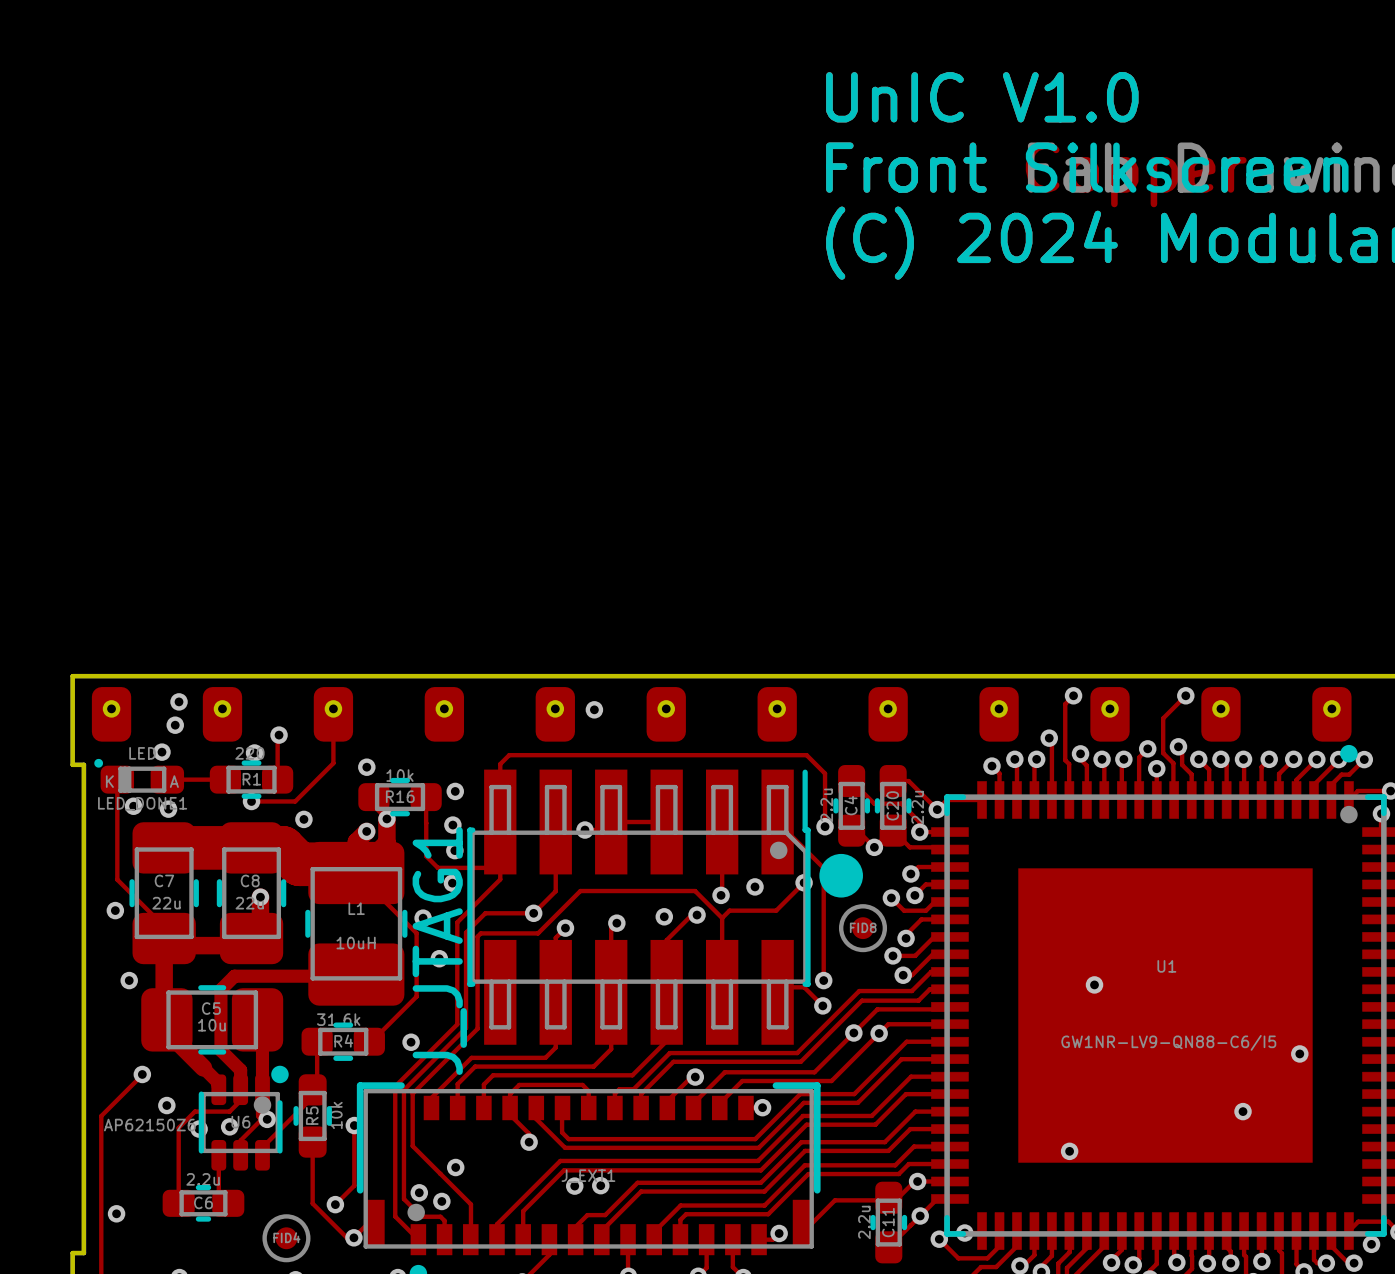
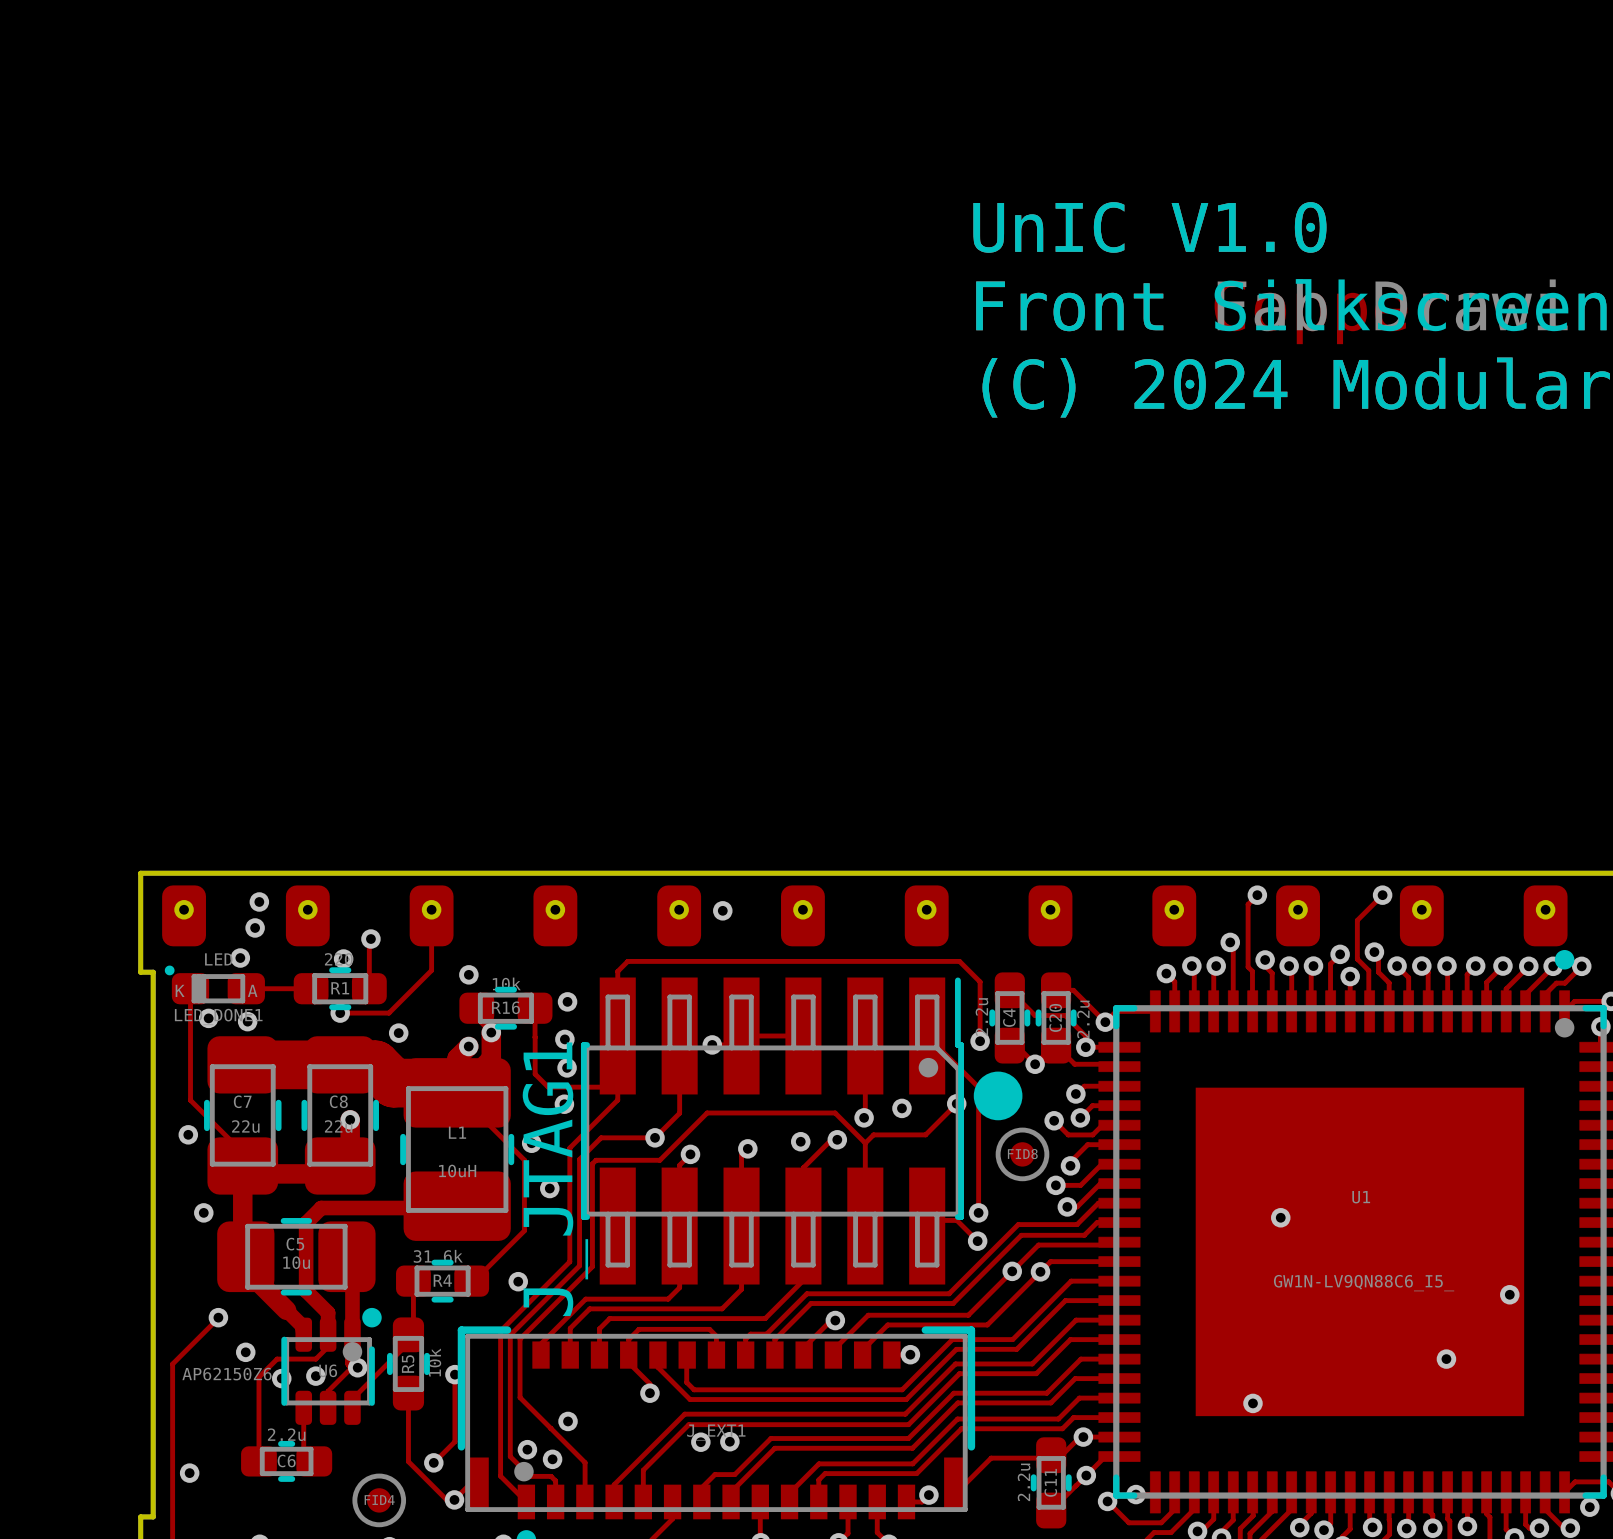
U1 value: GW1NR-LV9-QN88-C6/I5 (1168, 1042) -> GW1N-LV9QN88C6_I5_ (1364, 1283)

